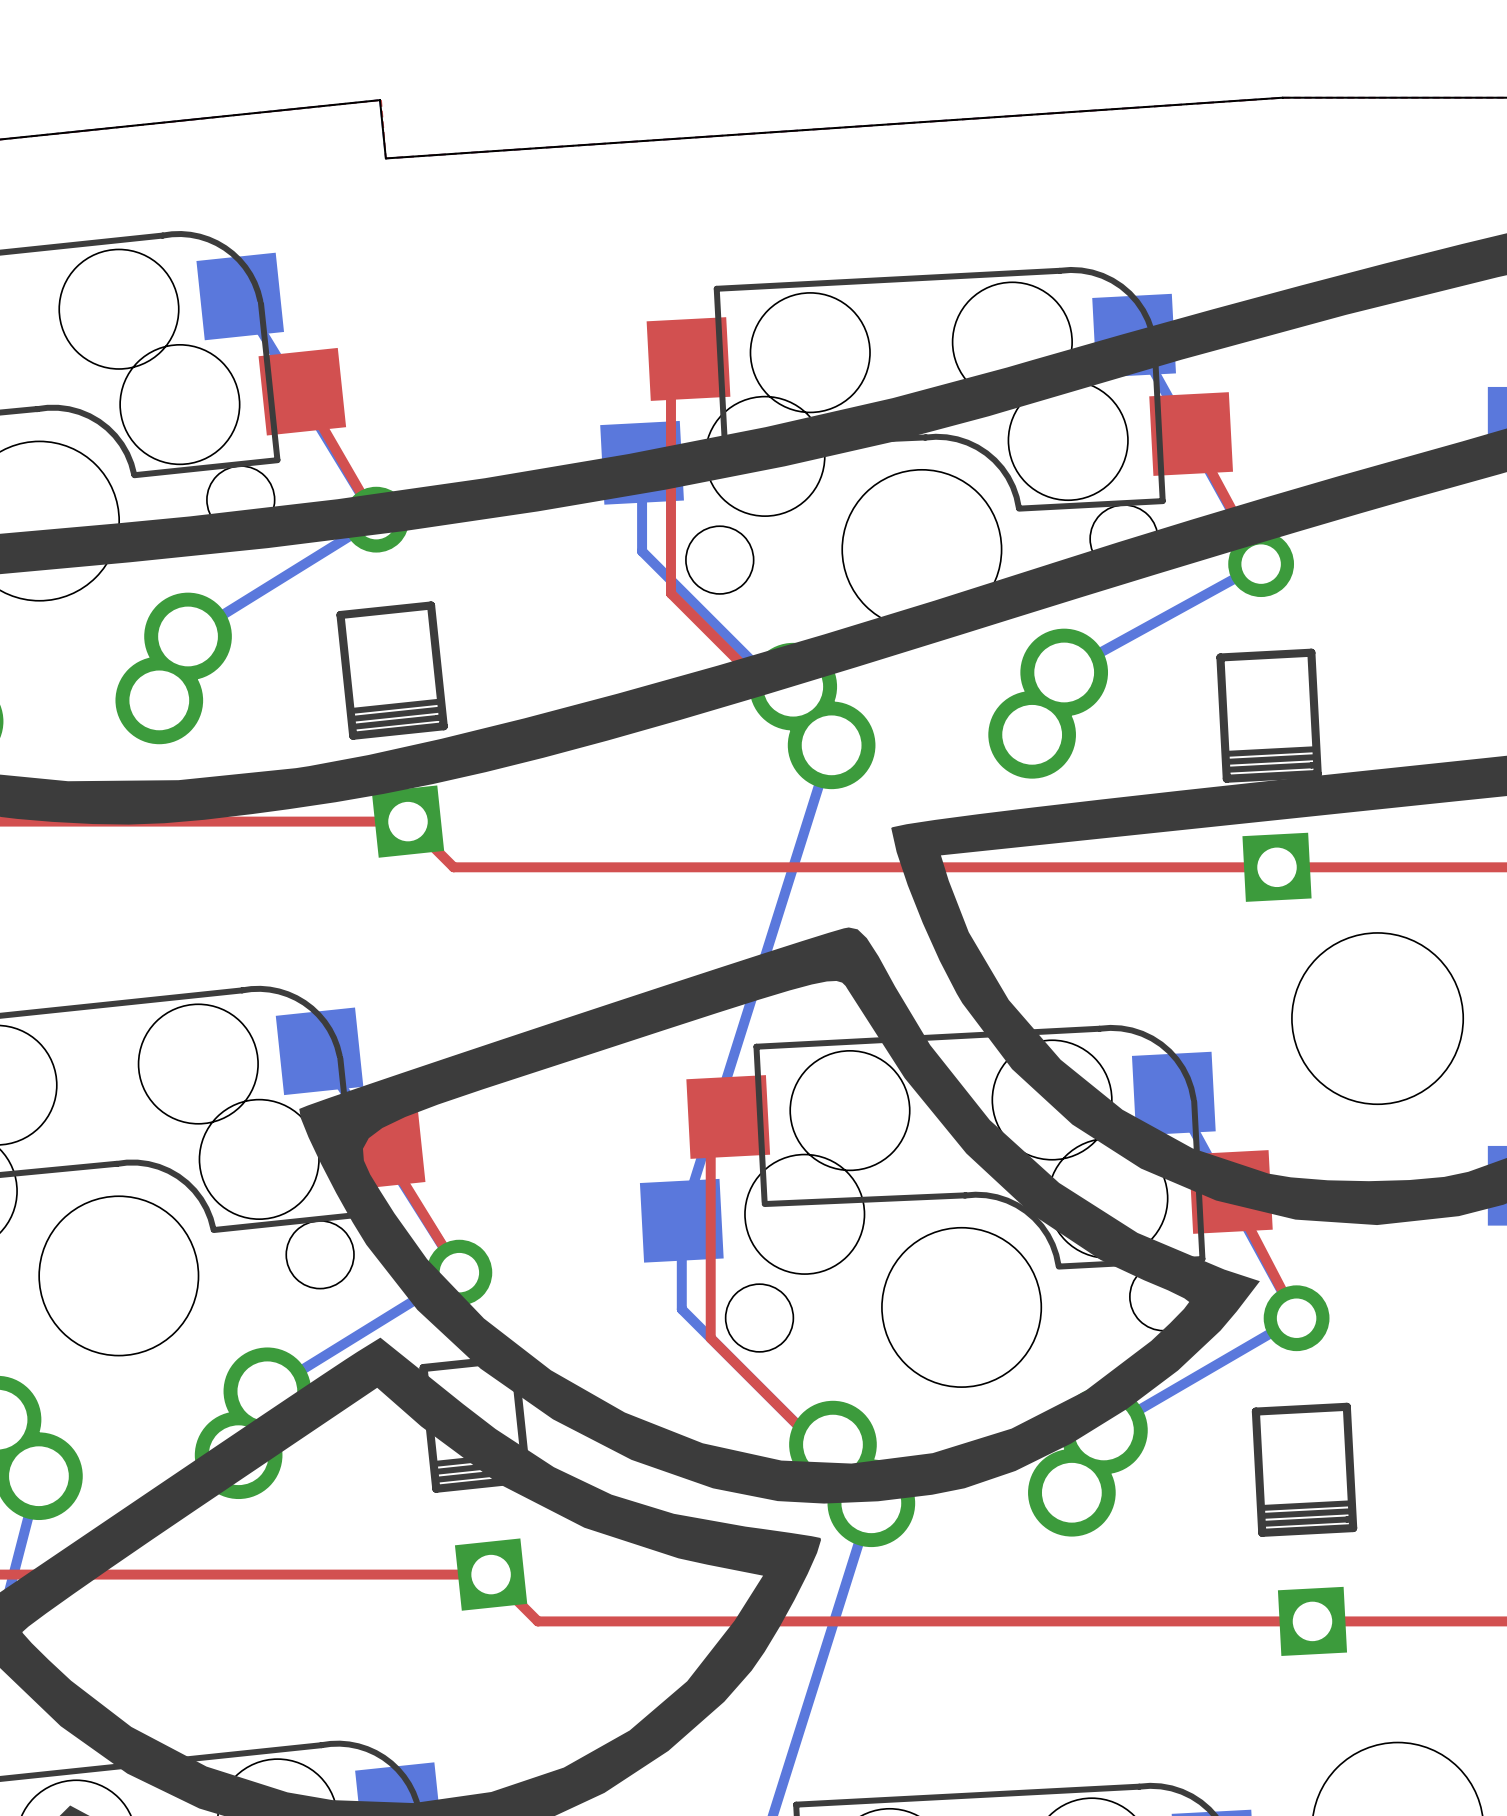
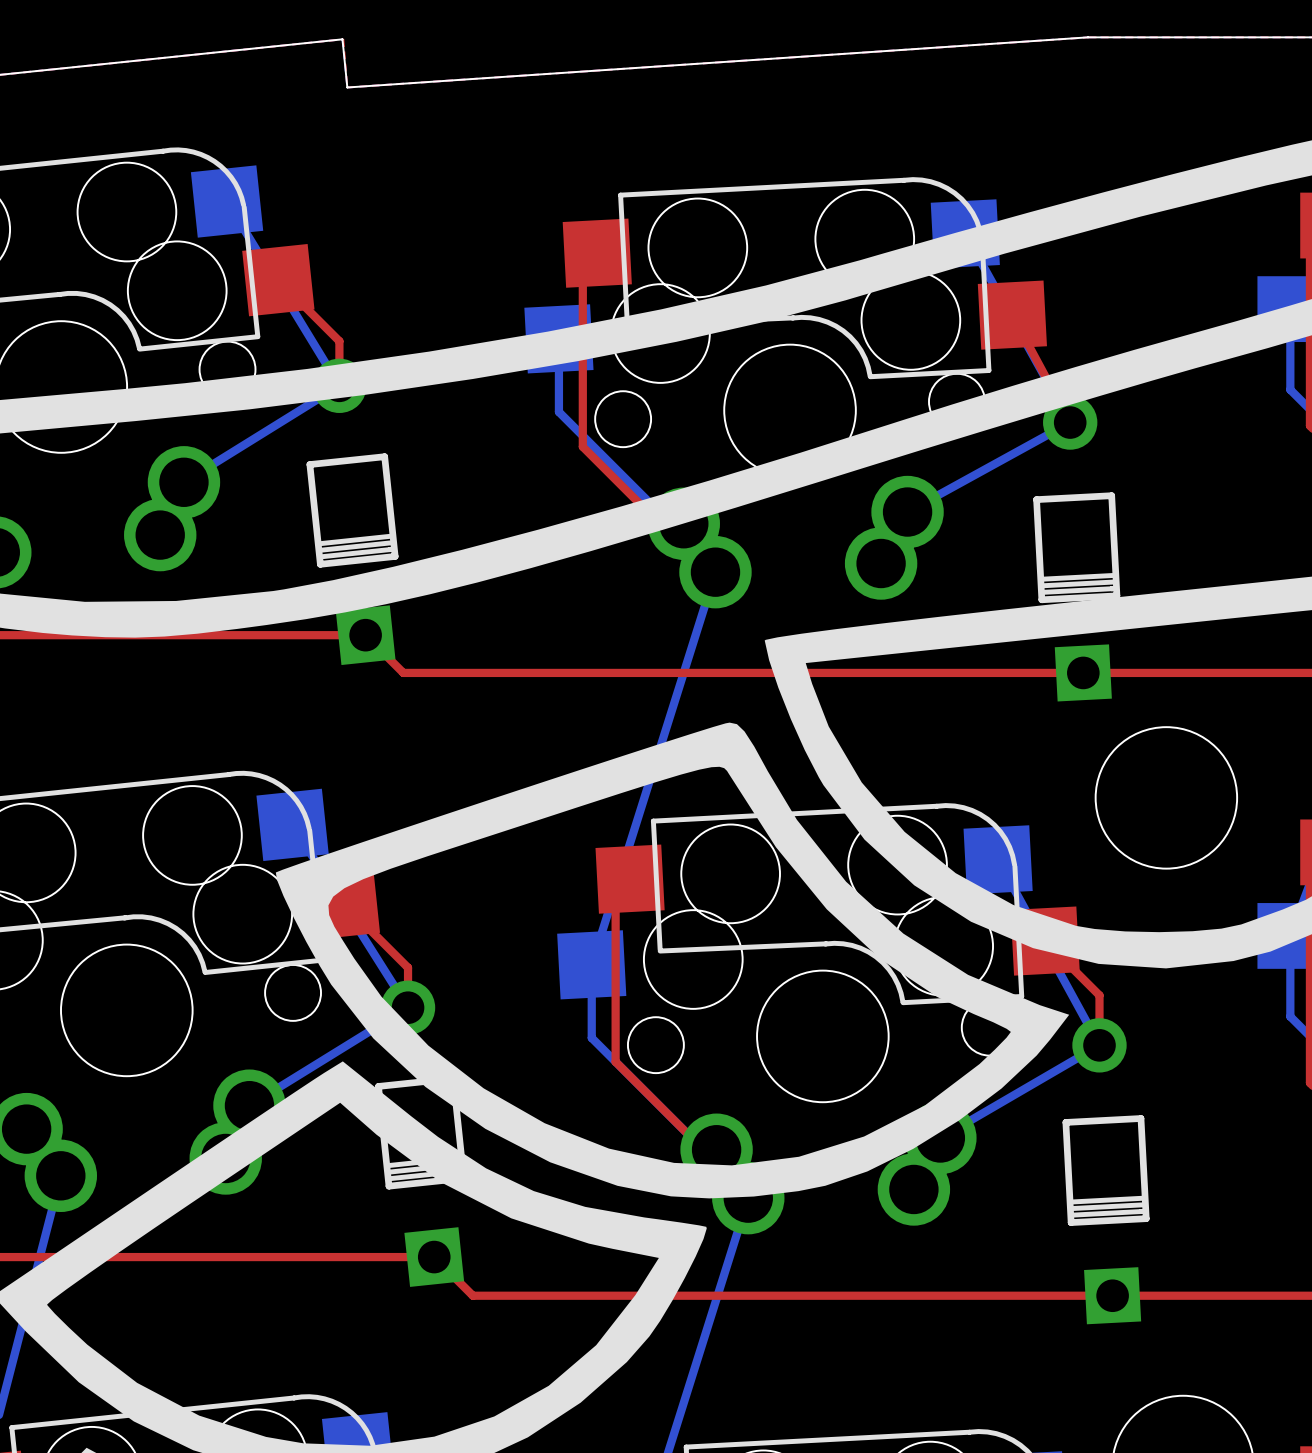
top track: (302, 391) (376, 519) -> (278, 280) (339, 341) (339, 385)
top track: (381, 1146) (459, 1272) -> (343, 903) (408, 967) (408, 1007)
top track: (1230, 1191) (1296, 1318) -> (1045, 941) (1099, 995) (1099, 1045)

